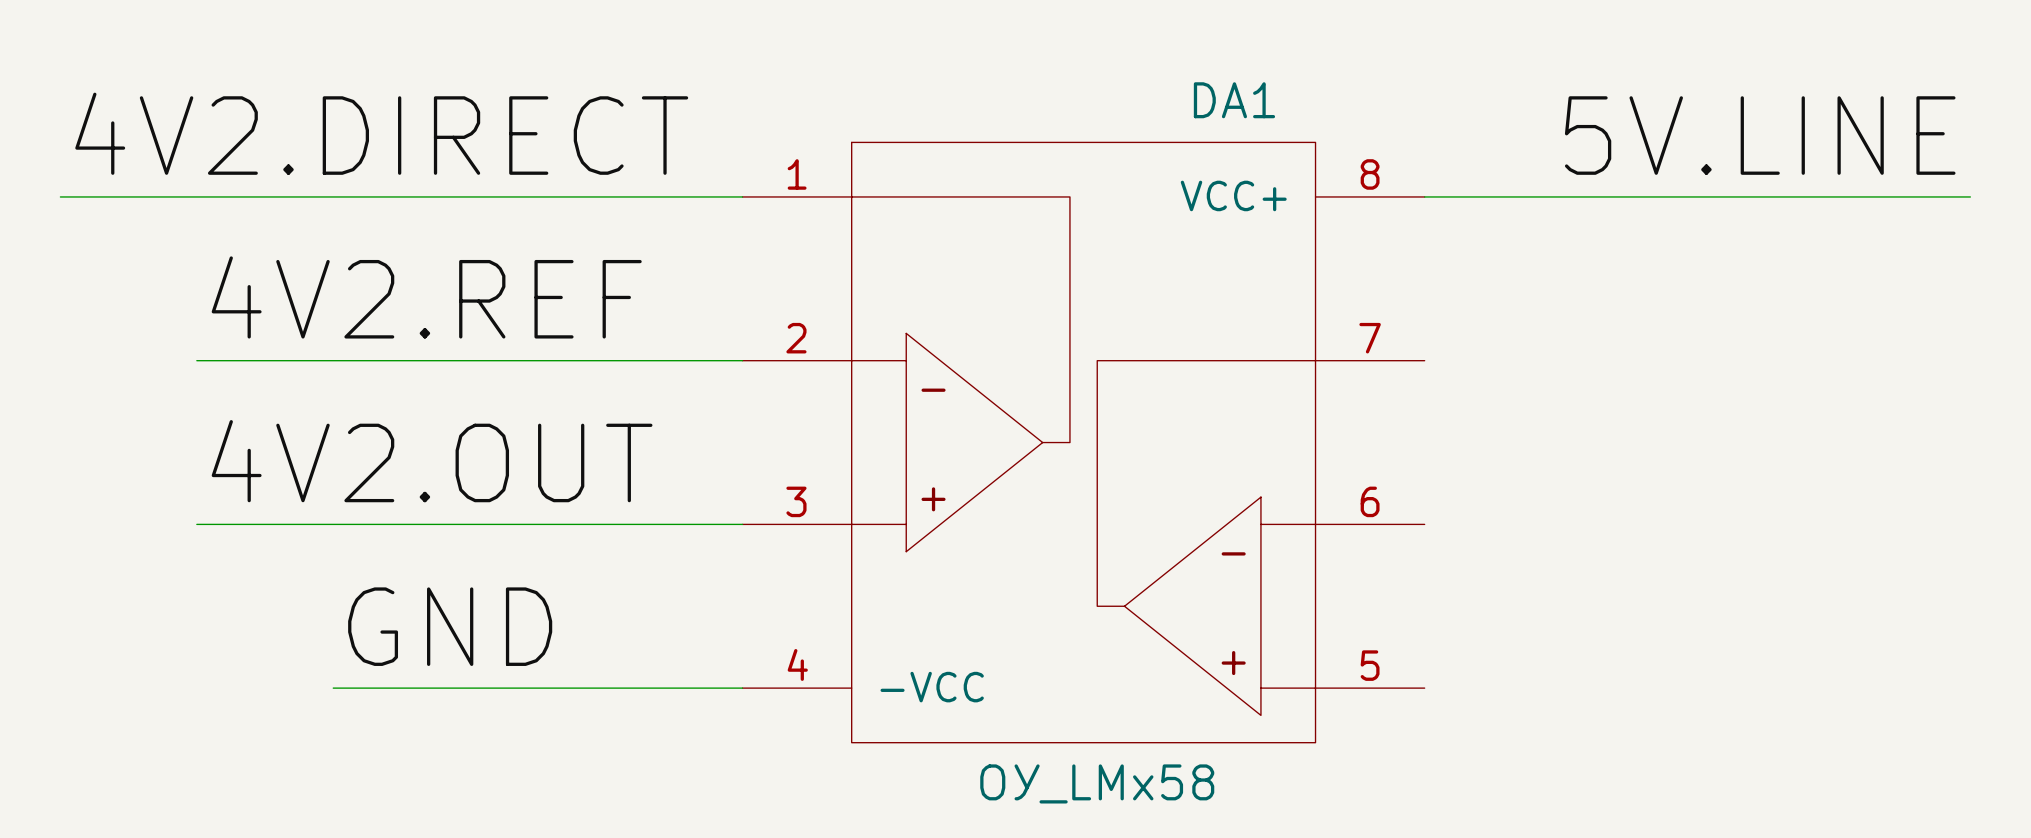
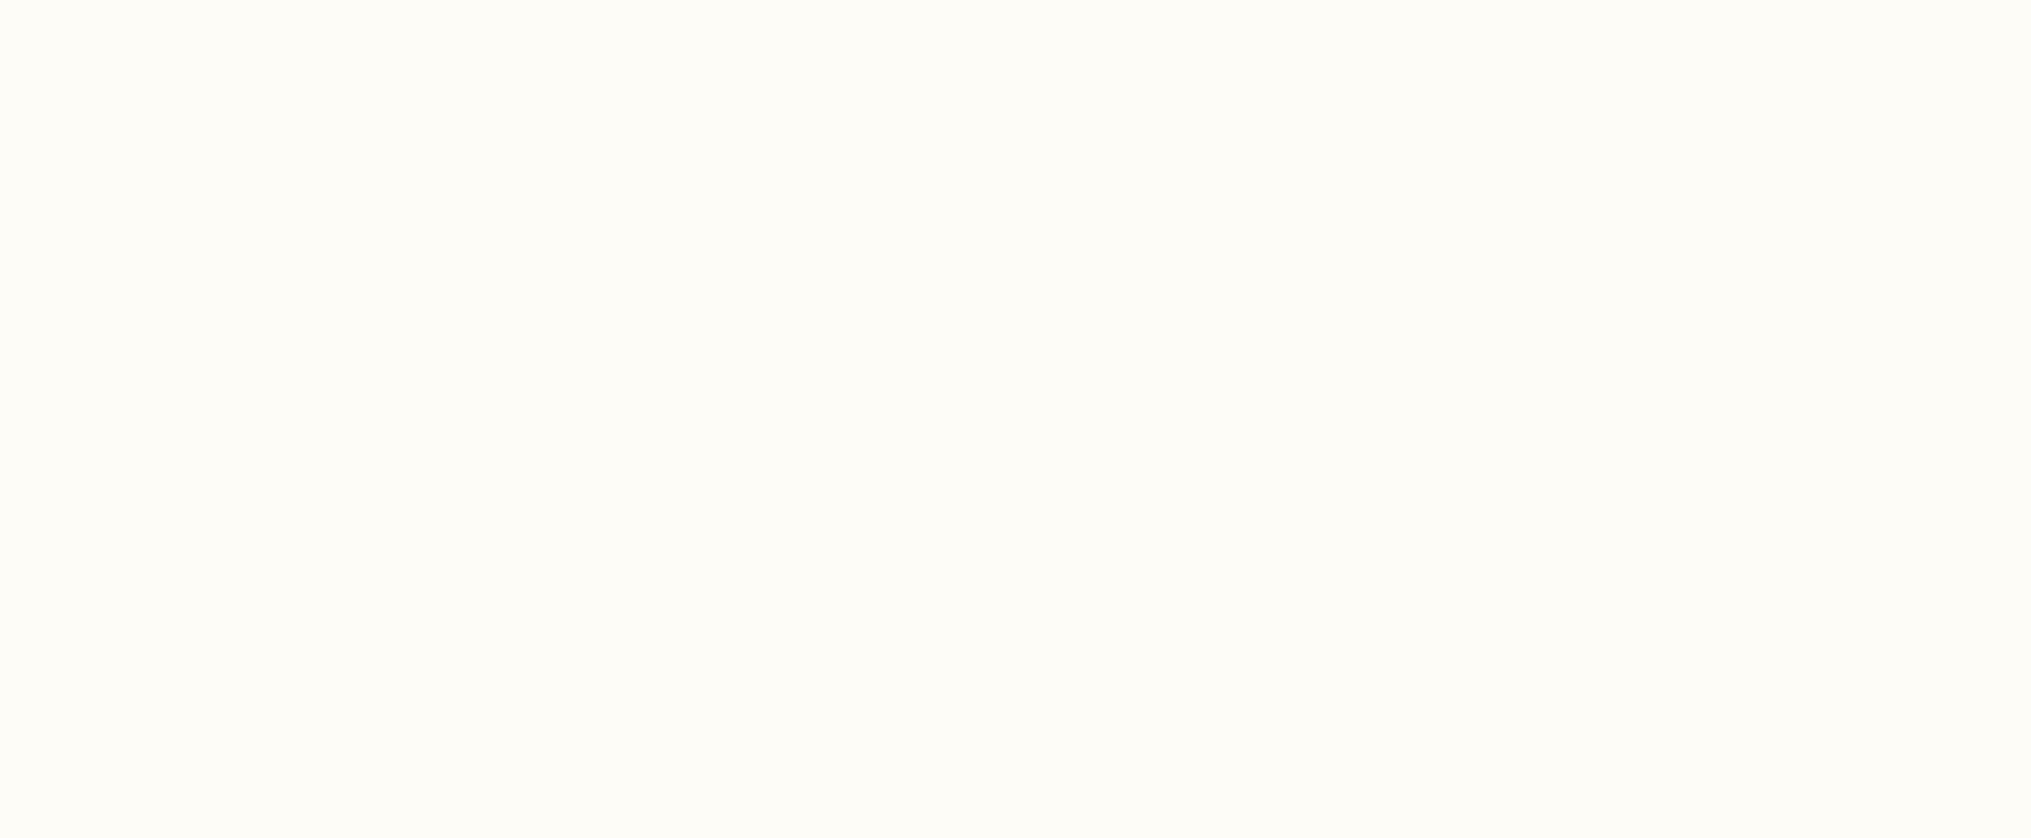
label: 4V2.DIRECT (381, 133) -> none
label: 5V.LINE (1760, 135) -> none
wire: (60, 196) (742, 196) -> none
wire: (1424, 196) (1970, 196) -> none
label: 4V2.REF (426, 297) -> none
wire: (196, 360) (742, 360) -> none
DA1: ОУ_LMx58 (1083, 442) -> none
label: 4V2.OUT (432, 461) -> none
wire: (196, 524) (742, 524) -> none
label: GND (450, 626) -> none
wire: (333, 688) (742, 688) -> none

